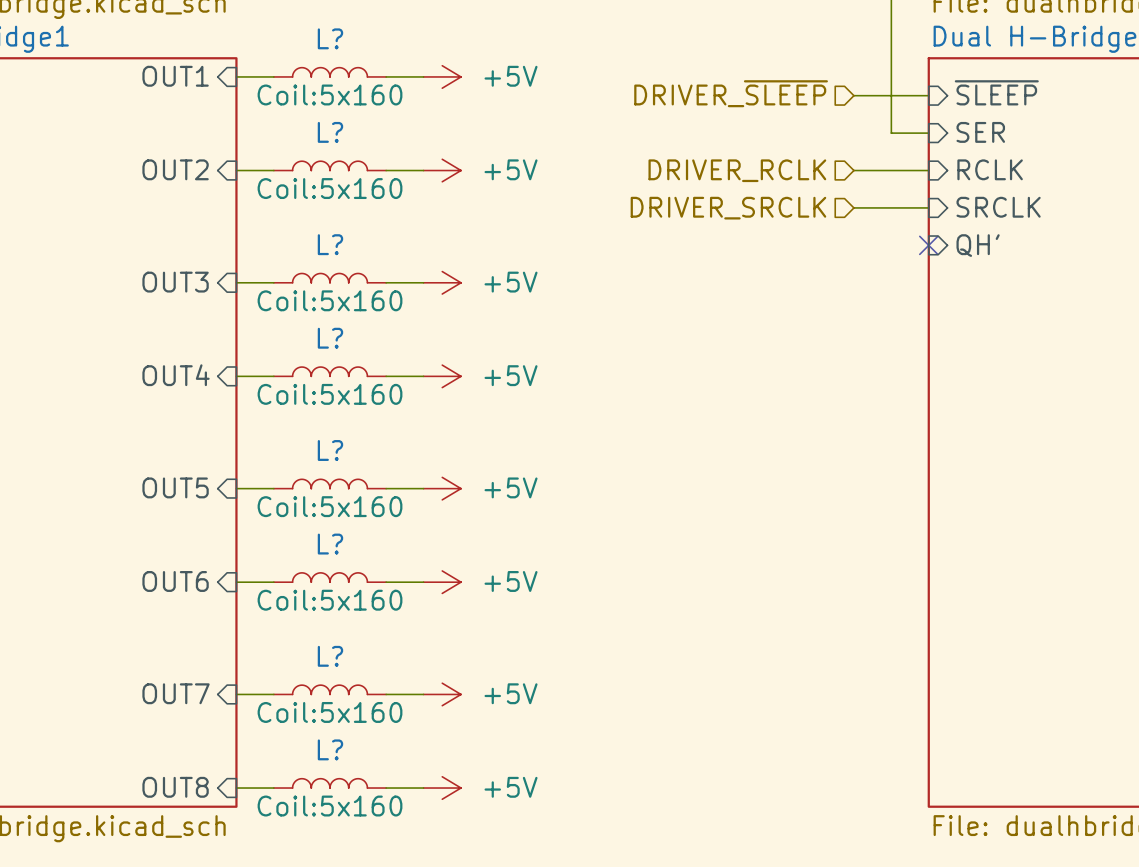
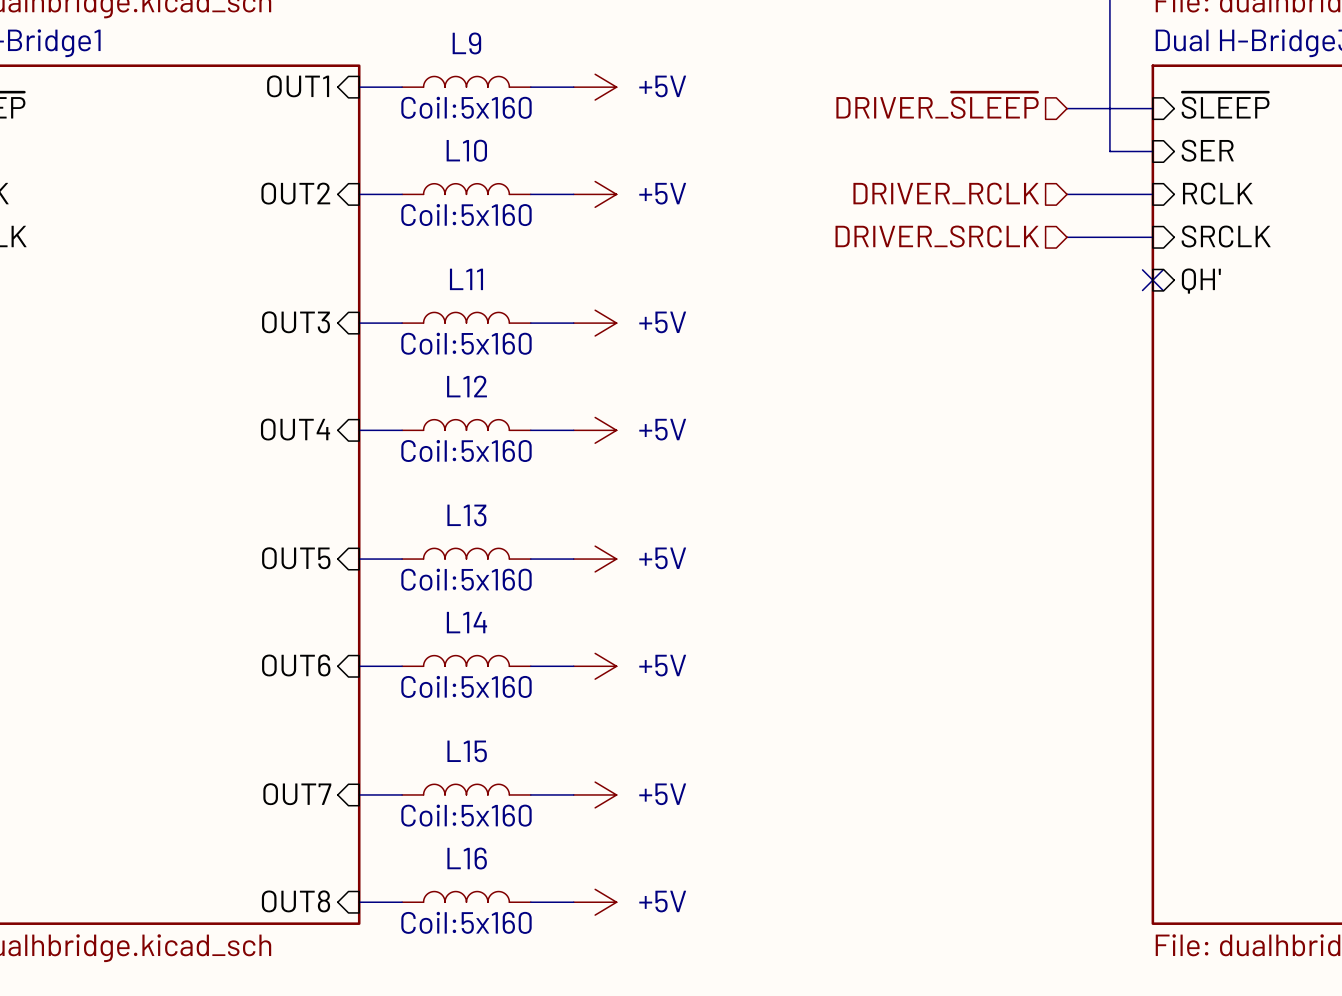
L? name: L? (330, 38) -> L9 (466, 43)
L? name: L? (330, 132) -> L10 (466, 150)
L? name: L? (330, 244) -> L11 (466, 279)
L? name: L? (330, 338) -> L12 (467, 386)
L? name: L? (330, 450) -> L13 (466, 515)
L? name: L? (330, 544) -> L14 (466, 622)
L? name: L? (330, 656) -> L15 (467, 751)
L? name: L? (330, 749) -> L16 (467, 858)

